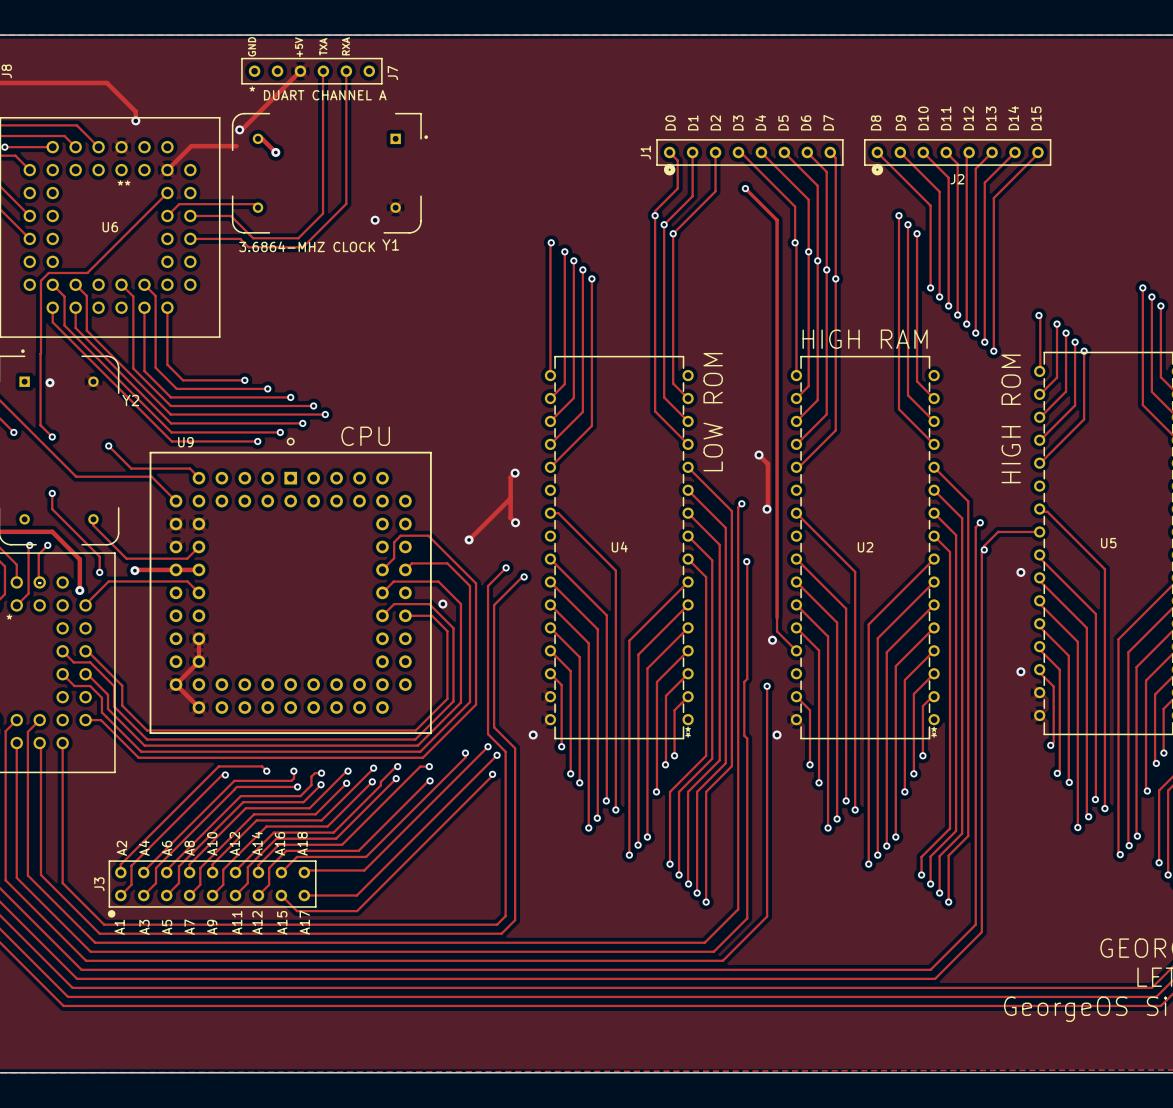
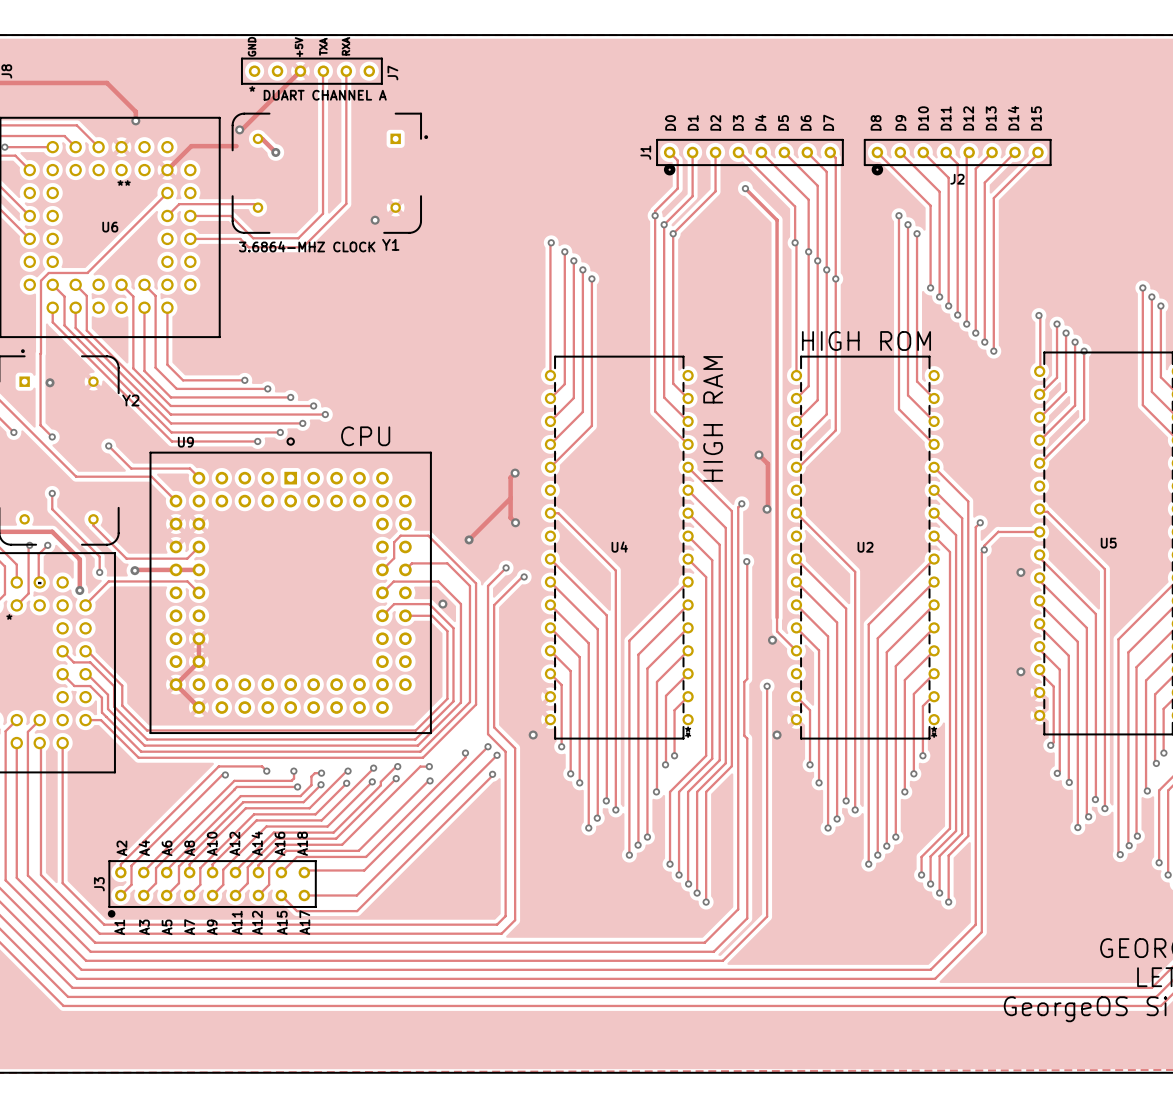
text: HIGH RAM (865, 339) -> HIGH ROM (866, 341)
text: LOW ROM (713, 412) -> HIGH RAM (713, 418)
text: HIGH ROM (1011, 418) -> none

